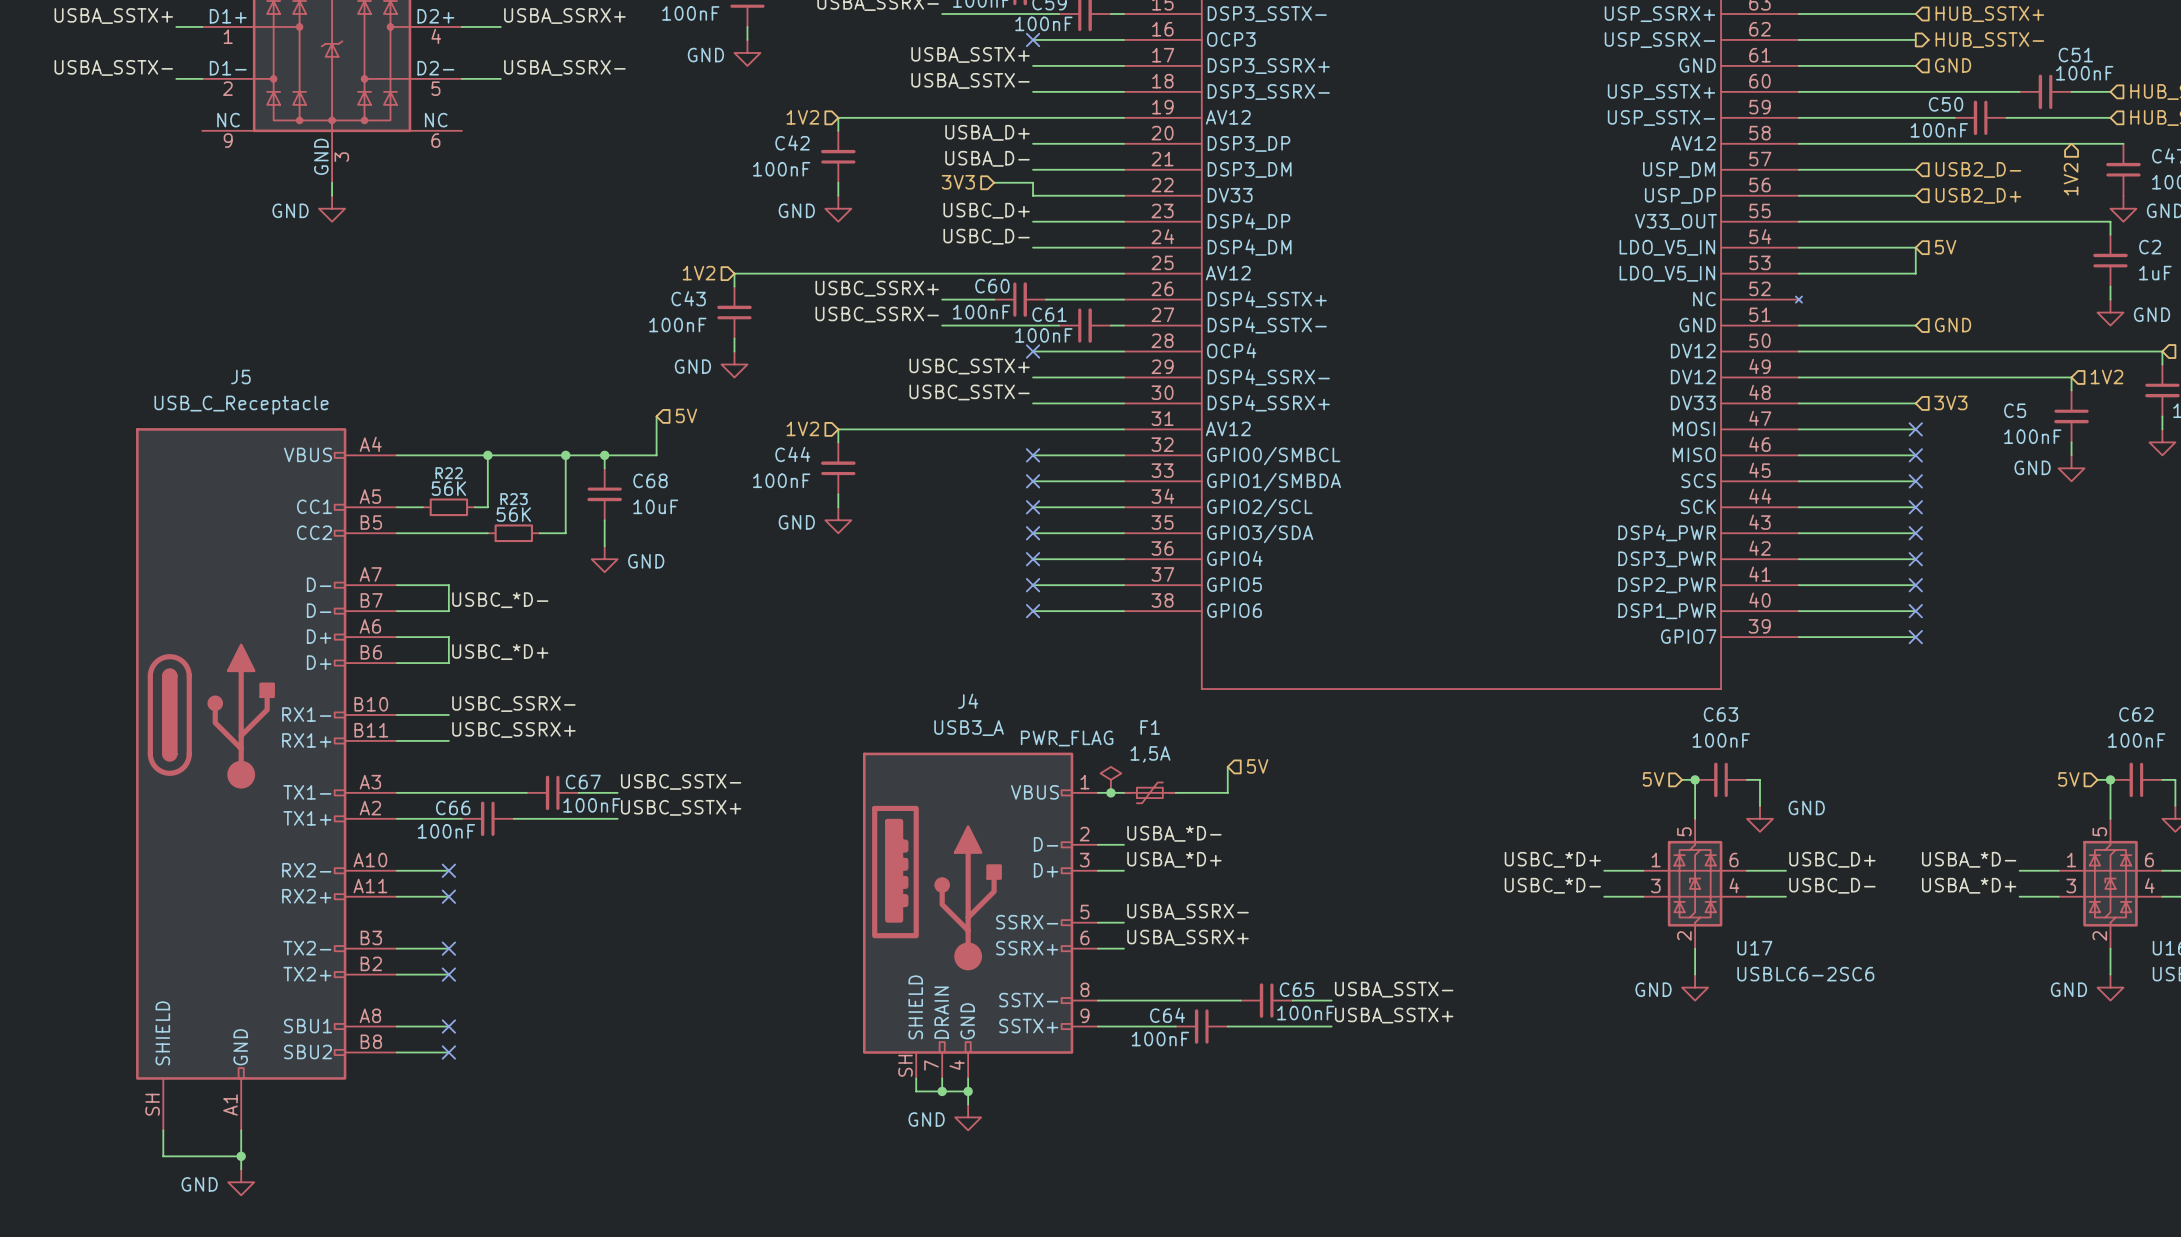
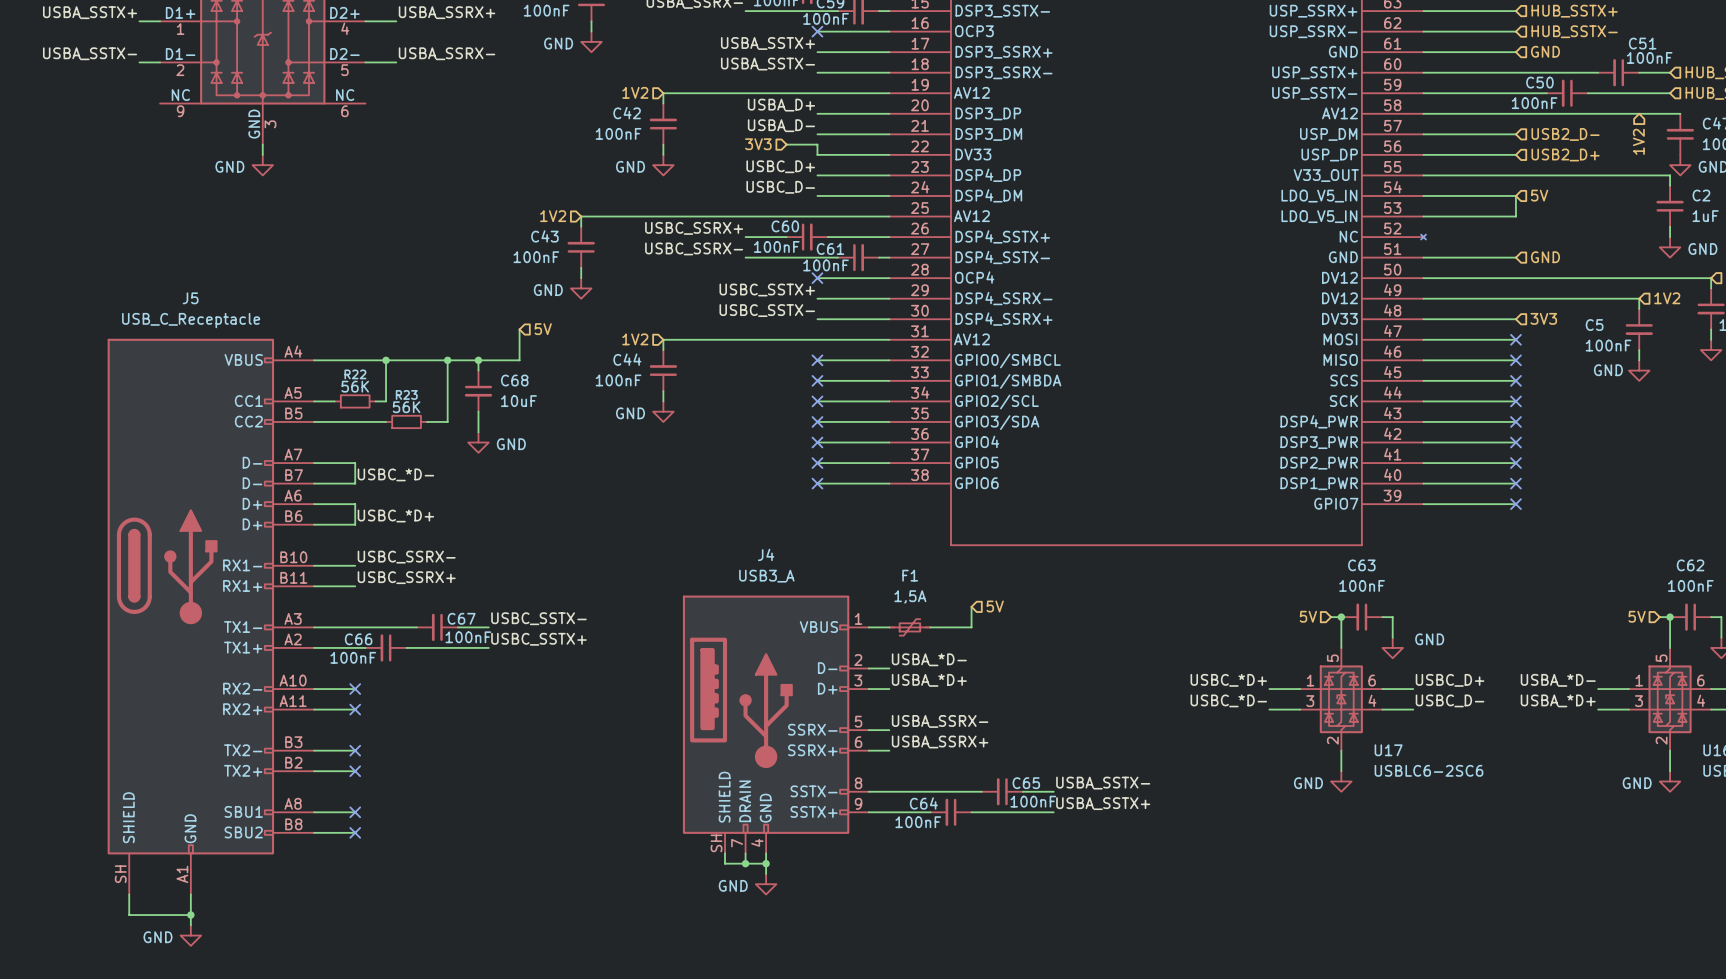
hierarchical label shape: output (1989, 40) -> input (1574, 31)
power symbol: PWR_FLAG (1110, 779) -> none
junction: (1110, 792) -> none

